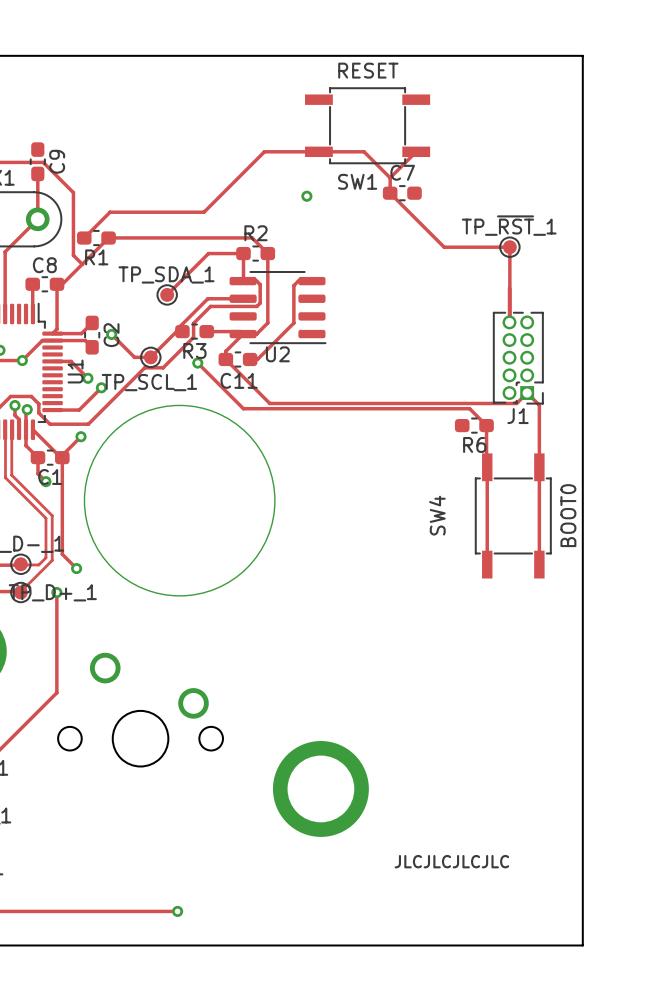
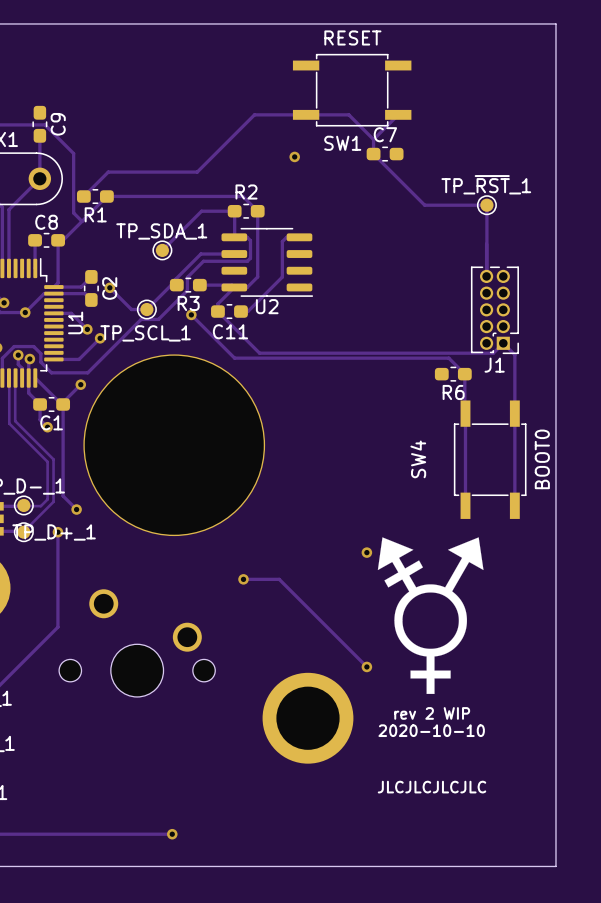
drawing: none -> [377, 537, 484, 694]
via: none -> (366, 552)
track: none -> (243, 579) (279, 579) (366, 666)
via: none -> (243, 579)
via: none -> (366, 666)
text: none -> rev 2 WIP (432, 713)
text: none -> 2020-10-10 (431, 730)

